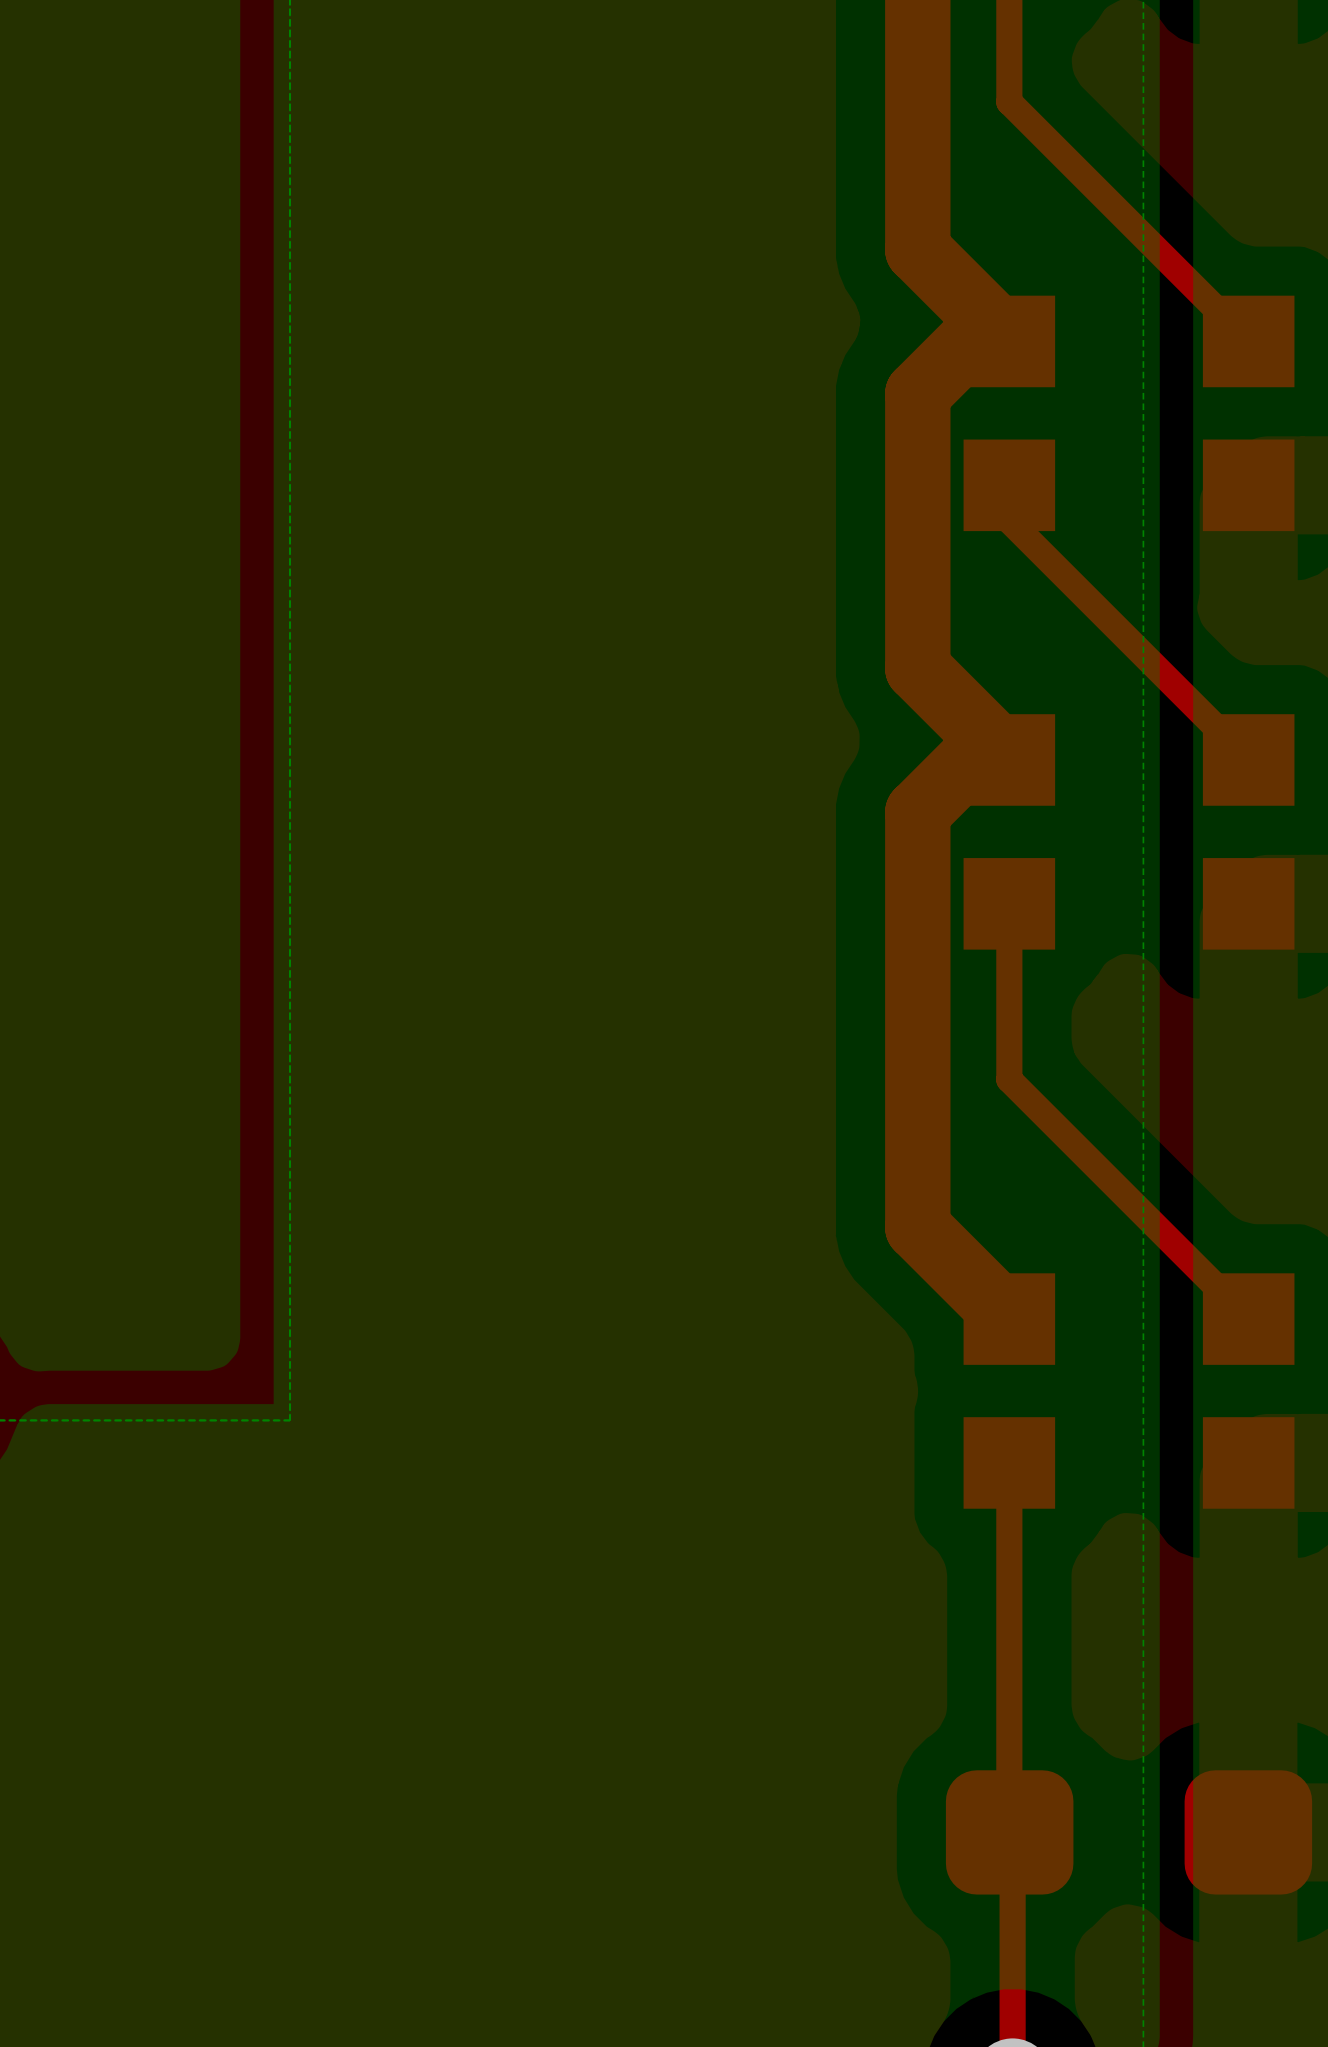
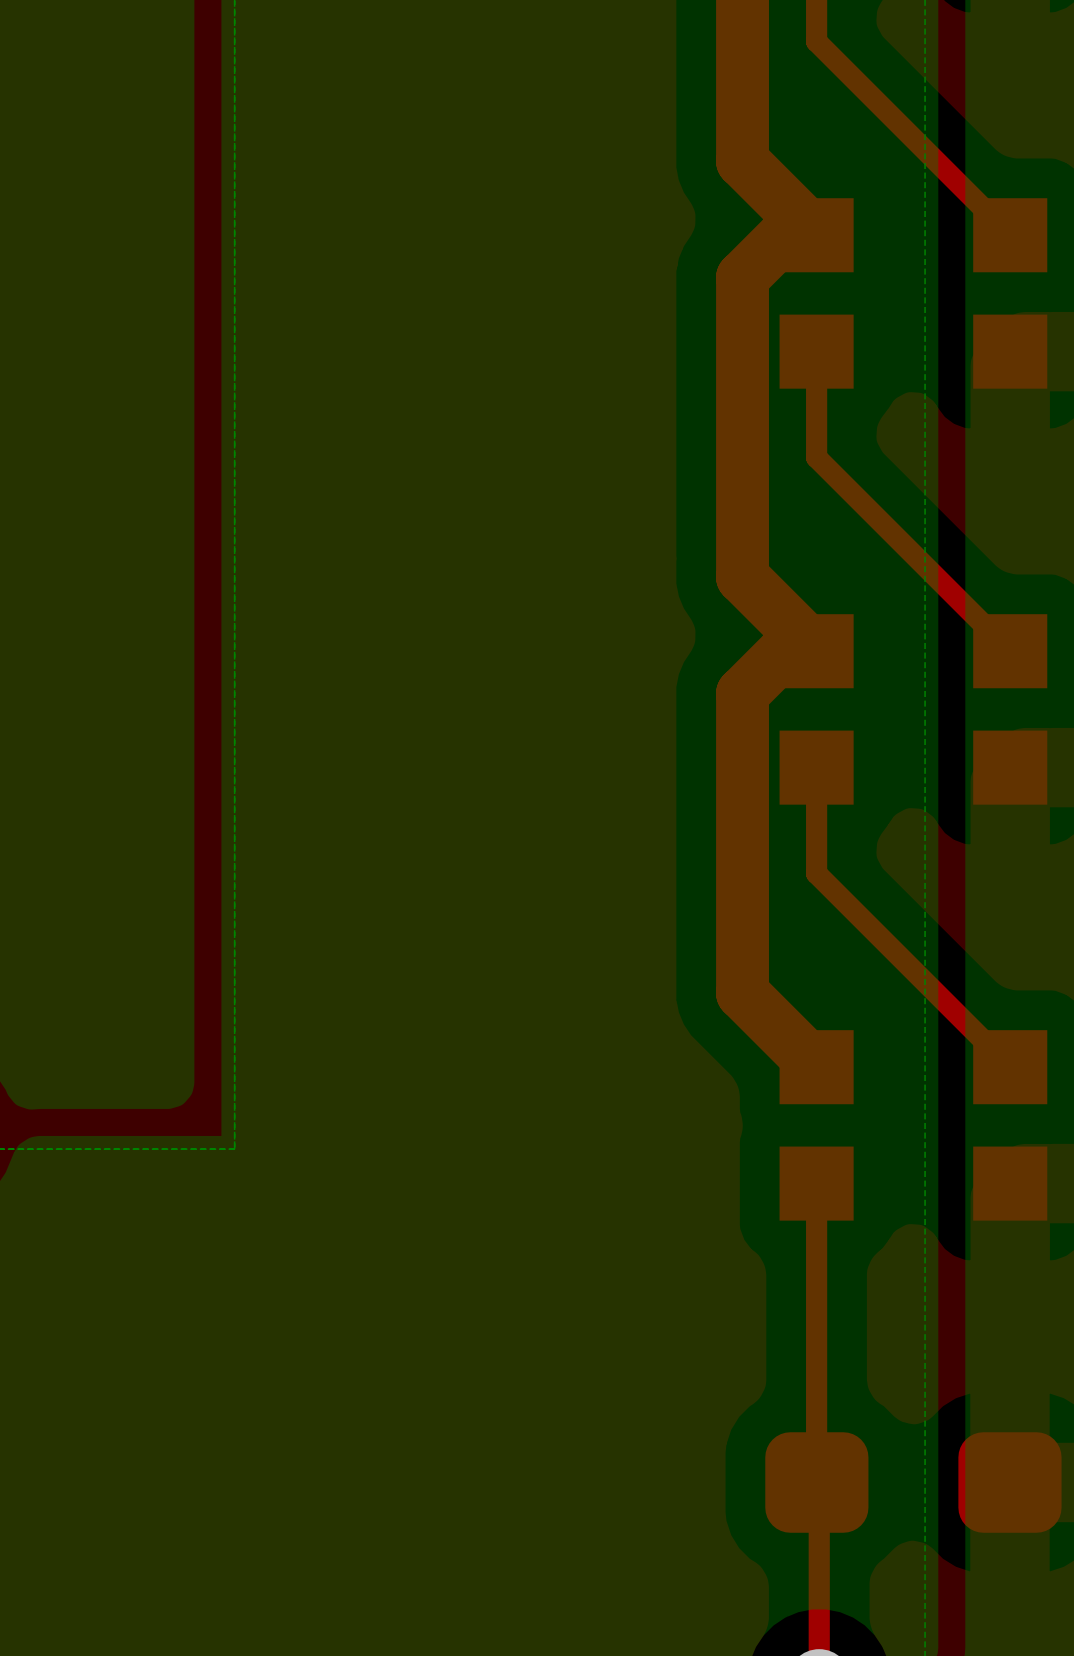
top track: (1009, 51) (1009, 102) (1248, 341) -> (816, 41) (1010, 235)
top track: (917, 199) (917, 249) (1009, 341) (970, 341) (917, 393) -> (742, 161) (816, 235) (784, 235) (742, 277) (742, 318)
part position: (1129, 413) -> (913, 293)
top track: (1009, 520) (1248, 759) -> (816, 421) (816, 457) (1010, 651)
top track: (917, 668) (1009, 759) (970, 759) (917, 812) (917, 857) -> (742, 540) (742, 577) (816, 651) (784, 651) (742, 693)
part position: (1129, 831) -> (913, 709)

